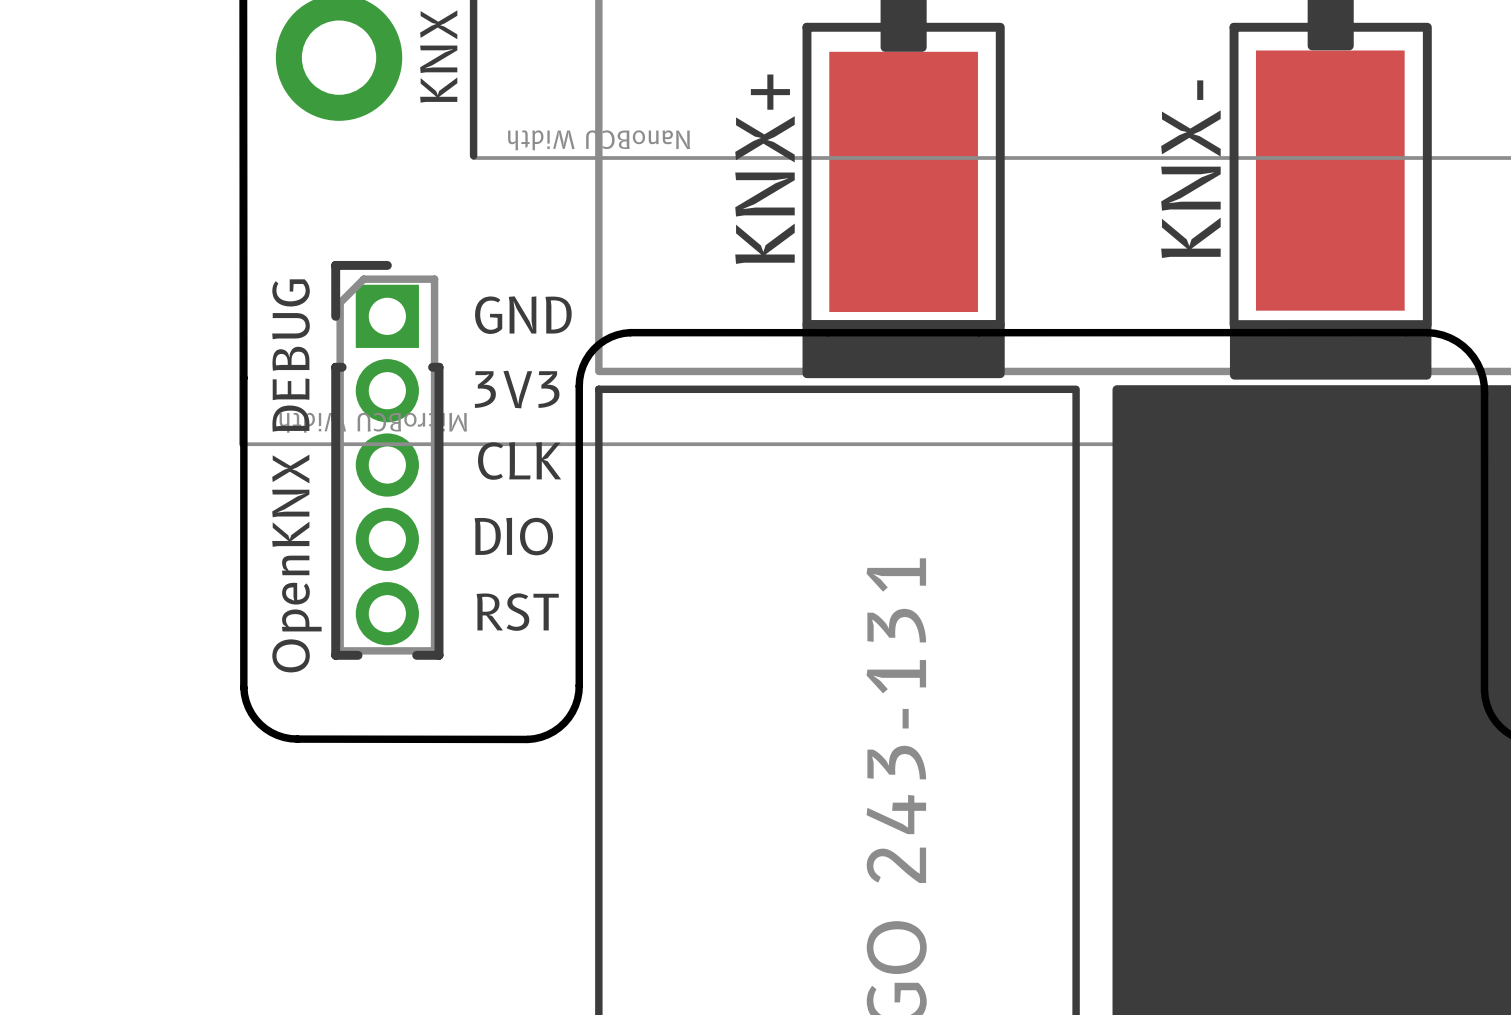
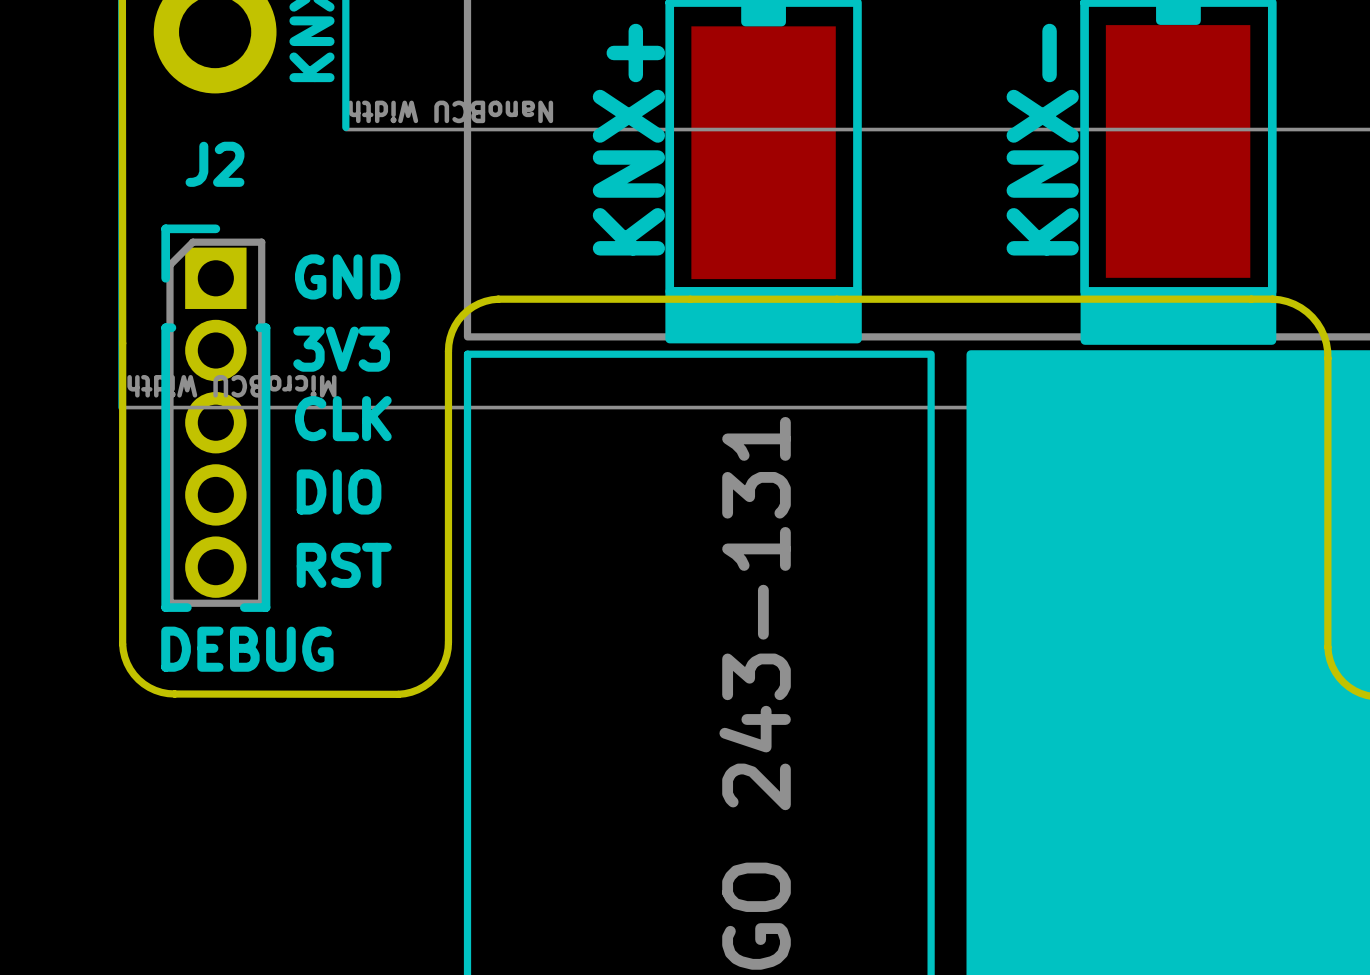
J2 name: none -> J2 (214, 164)
J2 position: (387, 460) -> (215, 418)
J2 text: OpenKNX DEBUG (296, 475) -> none
J2 text: none -> DEBUG (247, 649)

